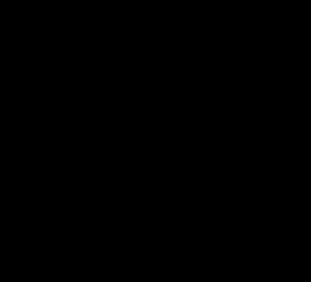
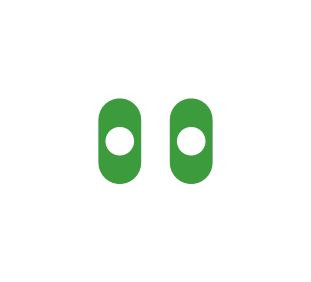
part: none -> (155, 141)

